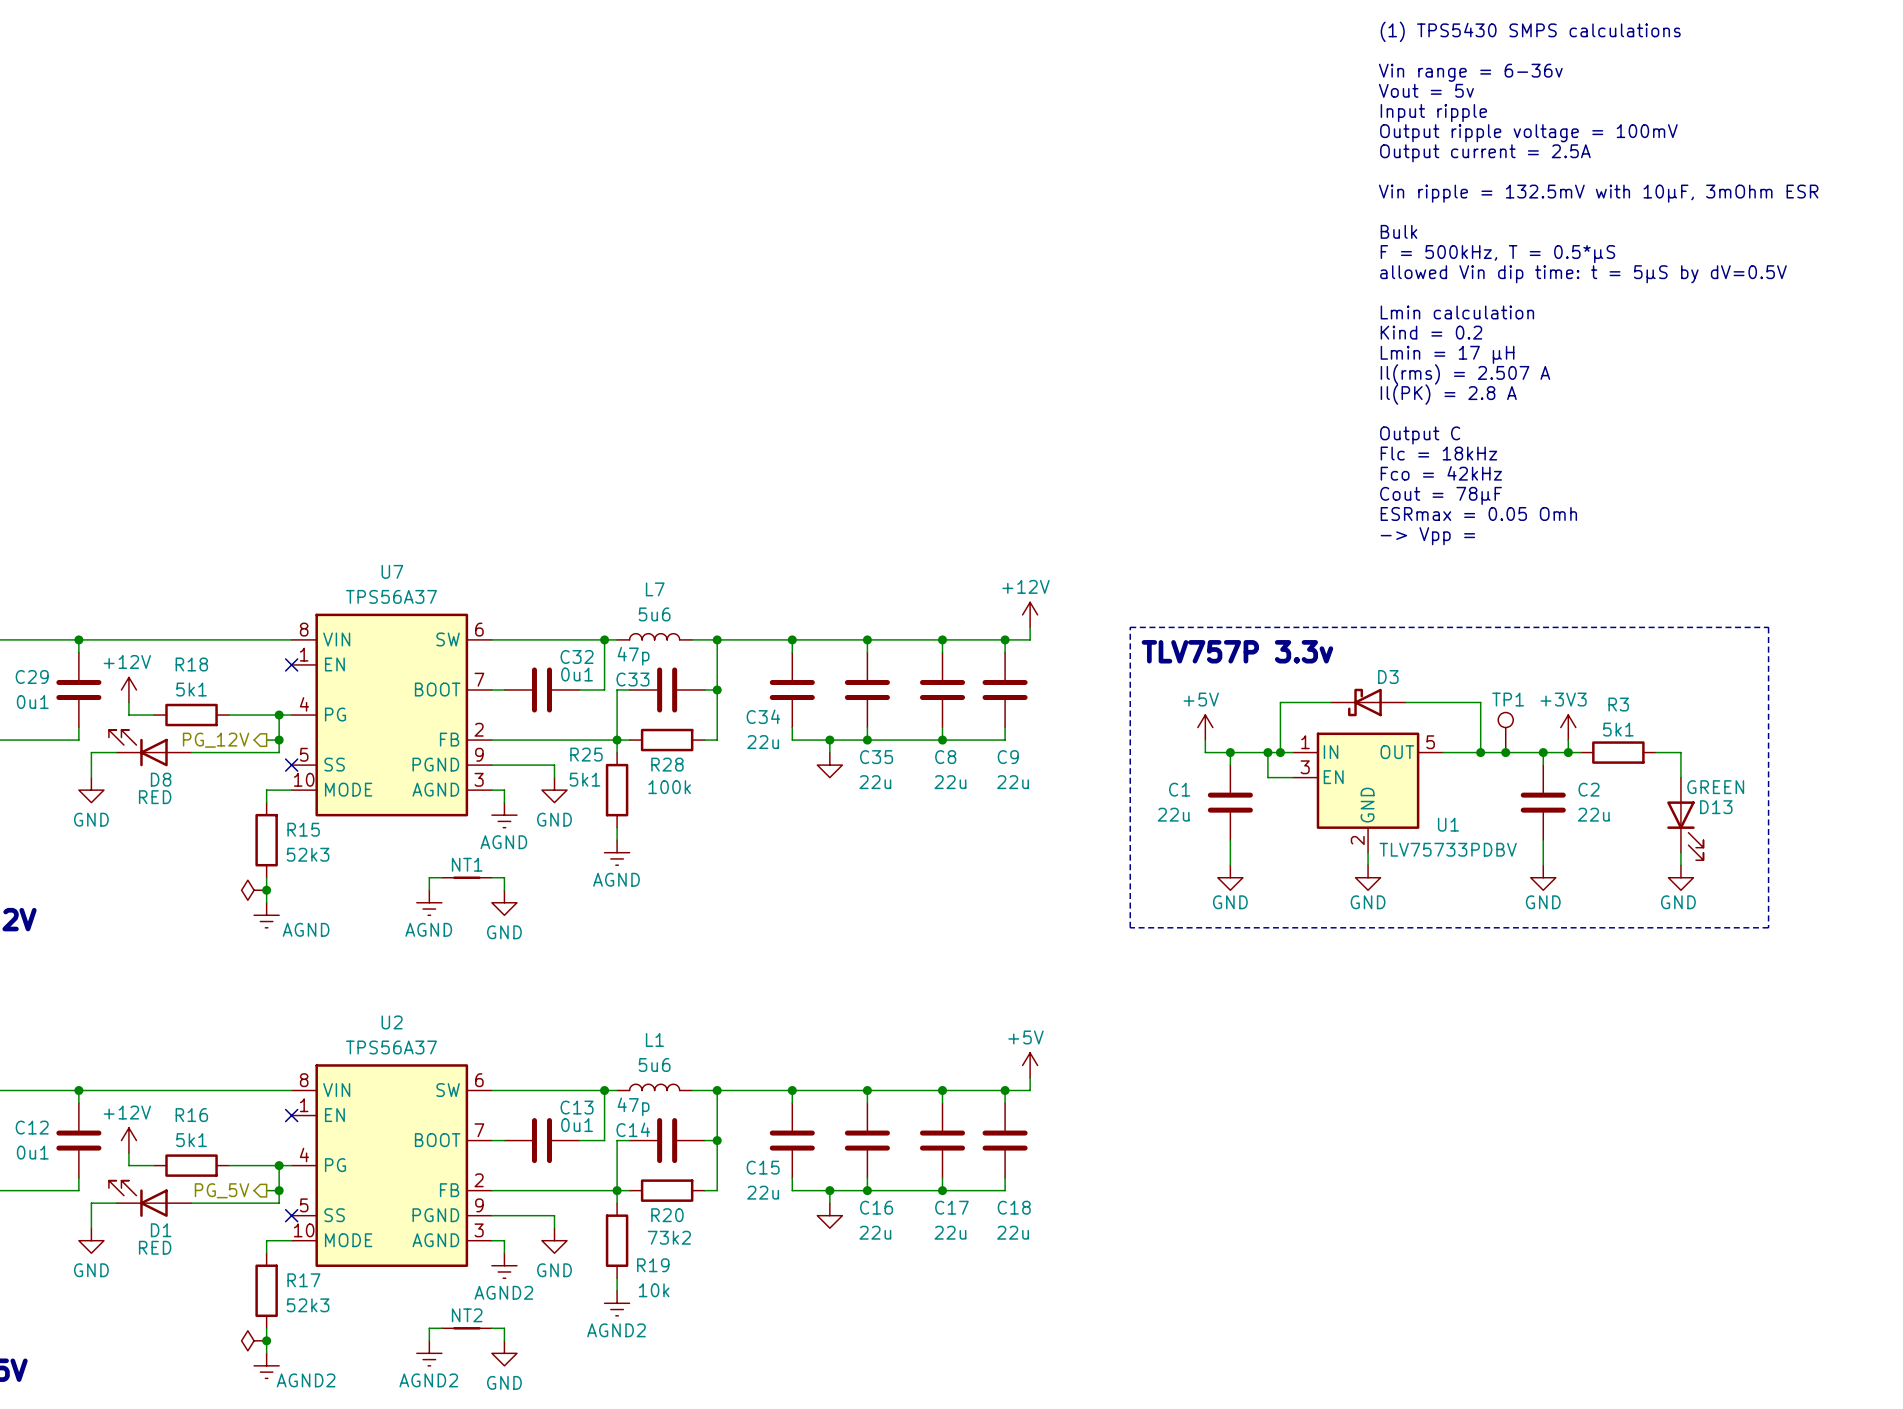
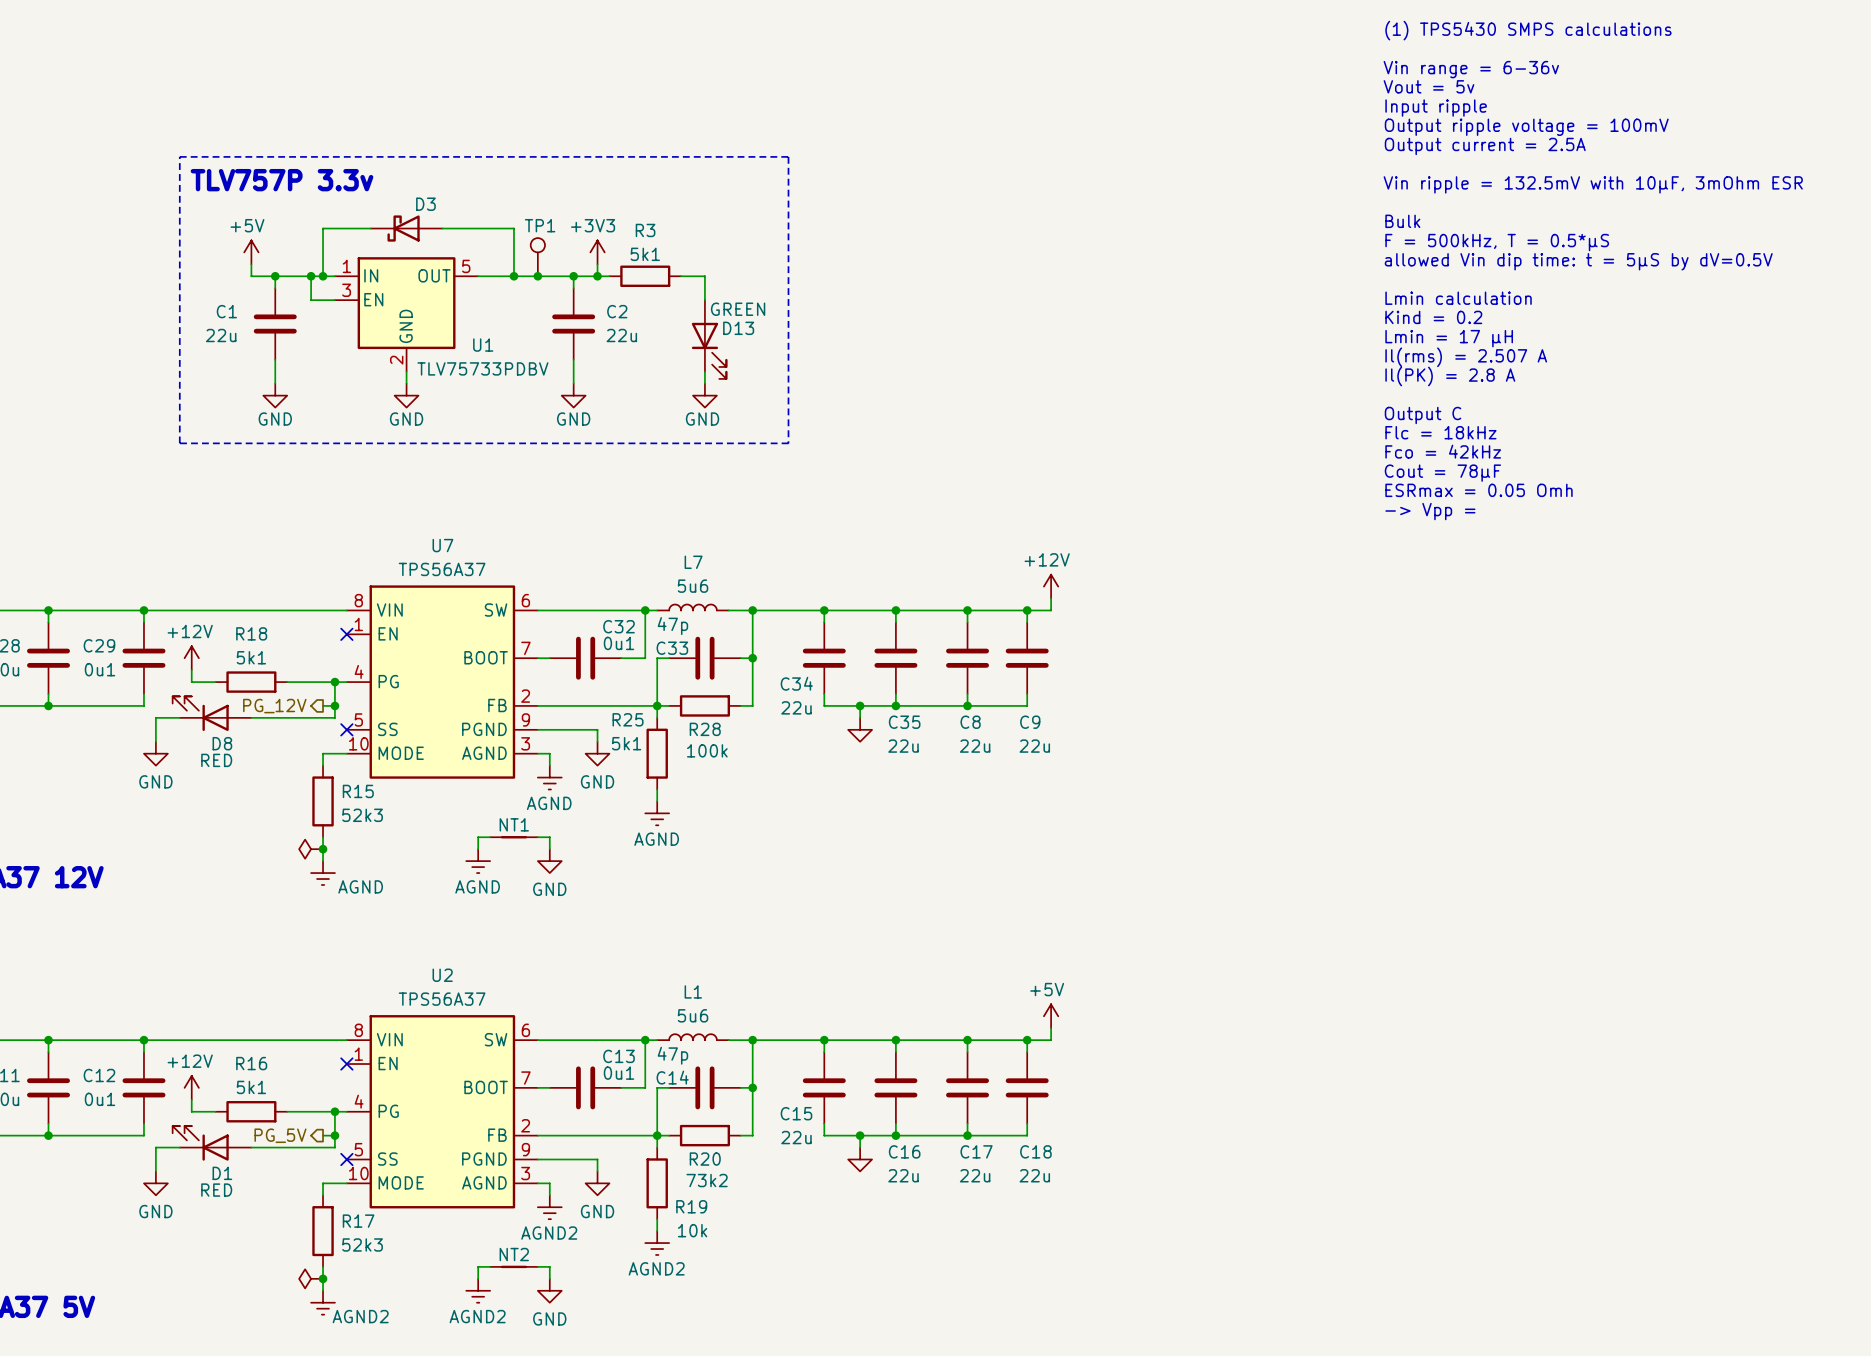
line: none -> (179, 156) (788, 156) (788, 443) (179, 443) (179, 156)
text: none -> TLV757P 3.3v (282, 180)
wire: none -> (370, 228) (323, 228) (323, 276)
wire: none -> (442, 228) (513, 228) (513, 276)
power symbol: none -> +5V (251, 252)
power symbol: none -> +3V3 (597, 252)
wire: none -> (251, 264) (251, 276) (334, 276)
wire: none -> (597, 264) (597, 276)
wire: none -> (275, 276) (275, 288)
junction: none -> (275, 276)
wire: none -> (311, 276) (311, 300) (334, 300)
junction: none -> (311, 276)
junction: none -> (323, 276)
wire: none -> (478, 276) (609, 276)
junction: none -> (513, 276)
junction: none -> (537, 276)
wire: none -> (573, 276) (573, 288)
junction: none -> (573, 276)
junction: none -> (597, 276)
wire: none -> (681, 276) (704, 276) (704, 300)
wire: none -> (275, 359) (275, 383)
wire: none -> (573, 359) (573, 383)
wire: none -> (406, 371) (406, 383)
wire: none -> (704, 371) (704, 383)
power symbol: none -> GND (275, 395)
power symbol: none -> GND (406, 395)
power symbol: none -> GND (573, 395)
power symbol: none -> GND (704, 395)
line: (1130, 627) (1768, 627) (1768, 927) (1130, 927) (1130, 627) -> none
text: TLV757P 3.3v (1237, 651) -> none
wire: (1330, 702) (1280, 702) (1280, 752) -> none
D3 position: (1368, 702) -> (406, 228)
wire: (1405, 702) (1480, 702) (1480, 752) -> none
power symbol: +5V (1205, 727) -> none
power symbol: +3V3 (1568, 727) -> none
TP1 position: (1505, 732) -> (537, 257)
wire: (1205, 740) (1205, 752) (1292, 752) -> none
wire: (1568, 740) (1568, 752) -> none
wire: (1230, 752) (1230, 765) -> none
junction: (1230, 752) -> none
wire: (1267, 752) (1267, 777) (1292, 777) -> none
junction: (1267, 752) -> none
junction: (1280, 752) -> none
wire: (1443, 752) (1580, 752) -> none
junction: (1480, 752) -> none
junction: (1505, 752) -> none
wire: (1543, 752) (1543, 765) -> none
junction: (1543, 752) -> none
junction: (1568, 752) -> none
R3 position: (1618, 752) -> (645, 276)
wire: (1655, 752) (1680, 752) (1680, 777) -> none
U1 position: (1368, 792) -> (406, 314)
C1 position: (1230, 802) -> (275, 324)
C2 position: (1543, 802) -> (573, 324)
D13 position: (1685, 818) -> (709, 339)
wire: (1230, 840) (1230, 865) -> none
wire: (1543, 840) (1543, 865) -> none
wire: (1368, 852) (1368, 865) -> none
wire: (1680, 852) (1680, 865) -> none
power symbol: GND (1230, 877) -> none
power symbol: GND (1368, 877) -> none
power symbol: GND (1543, 877) -> none
power symbol: GND (1680, 877) -> none

